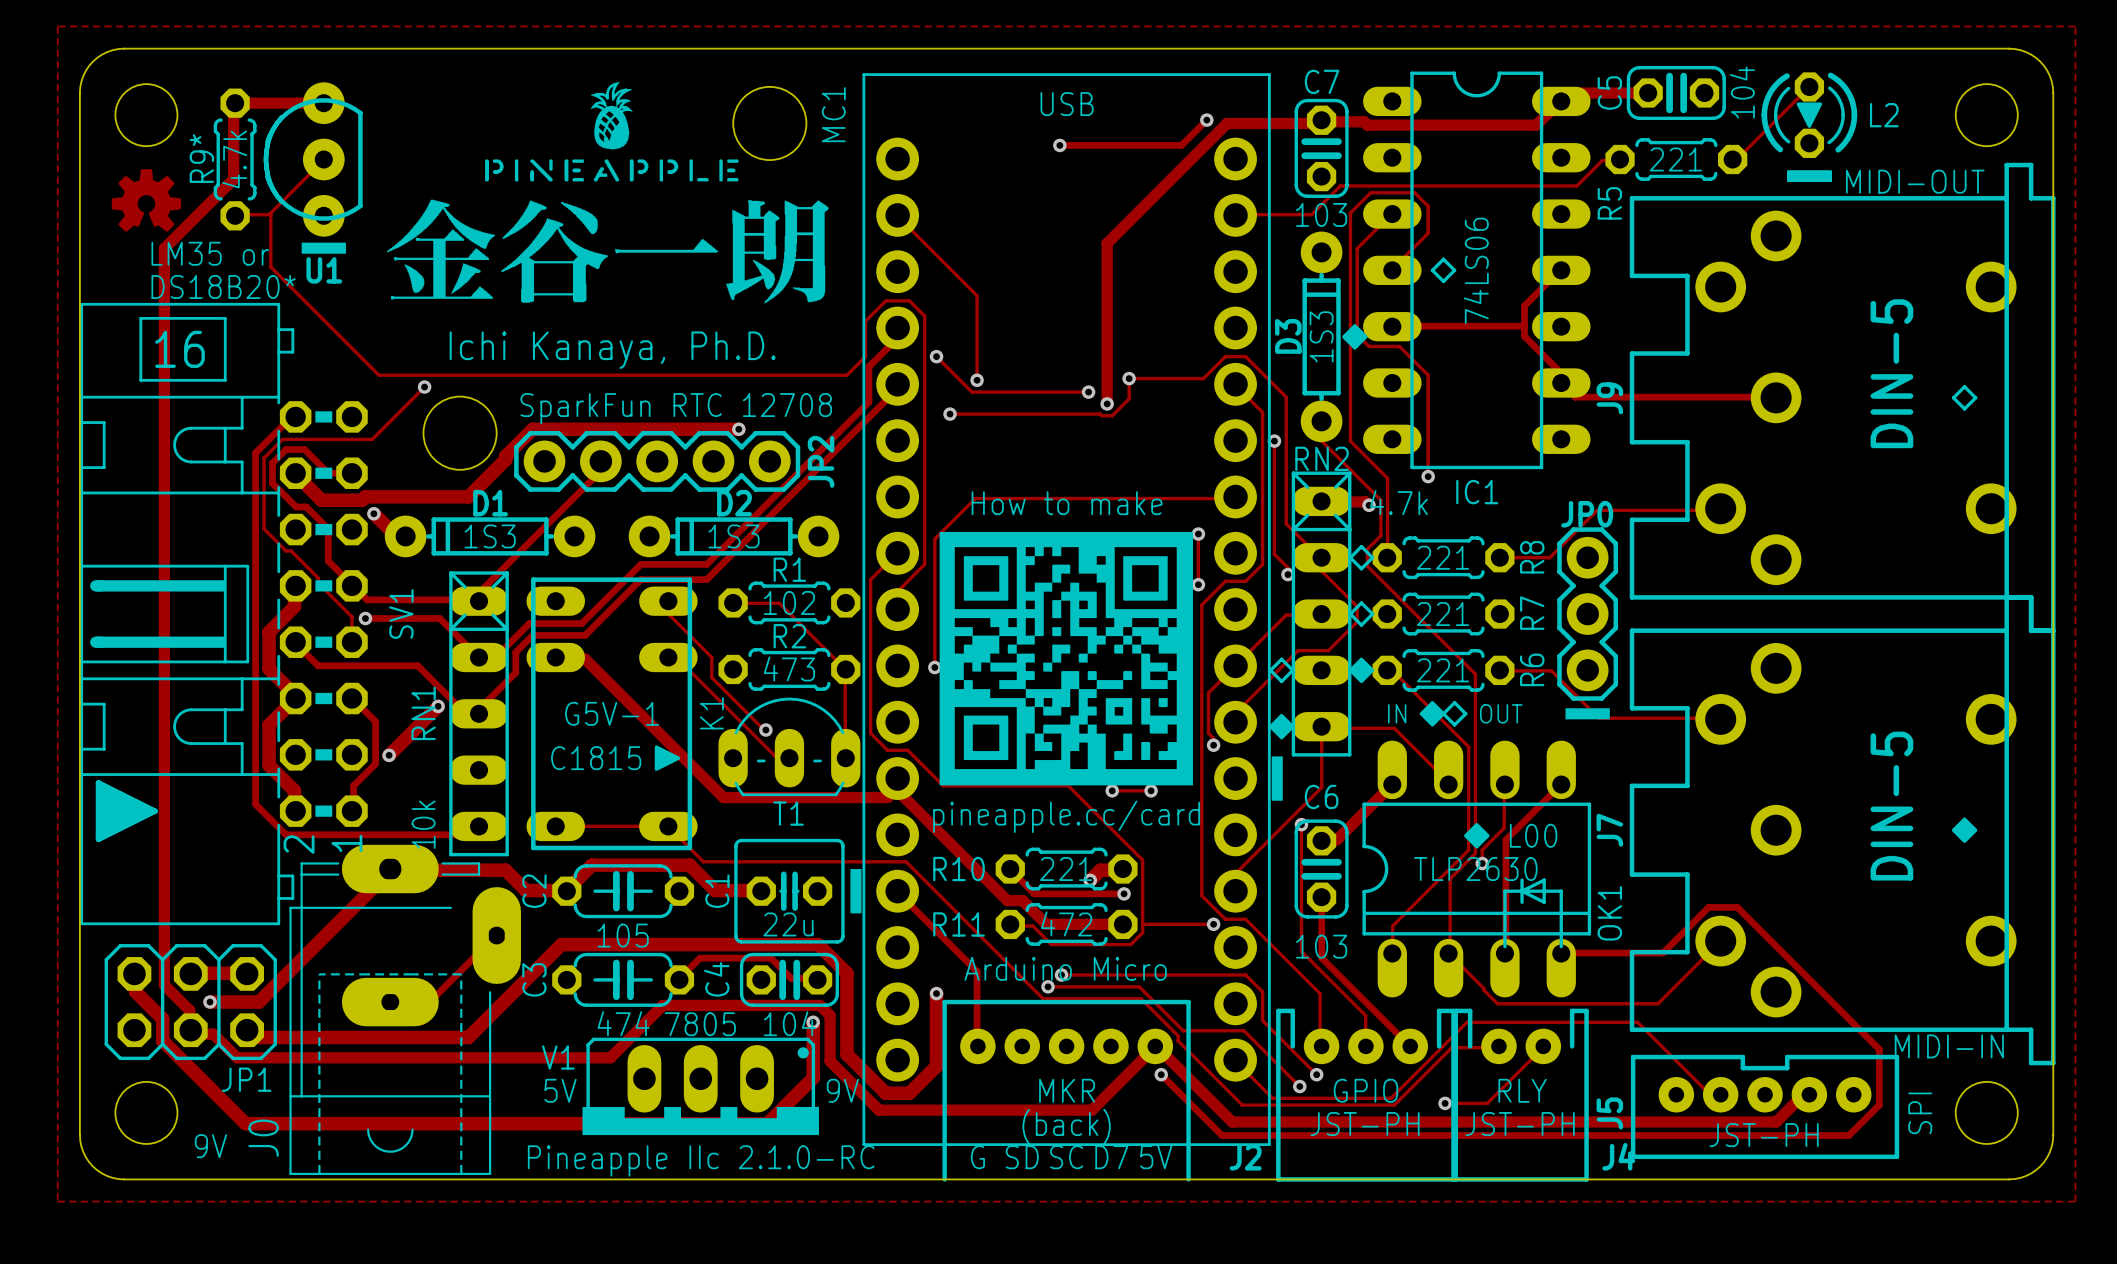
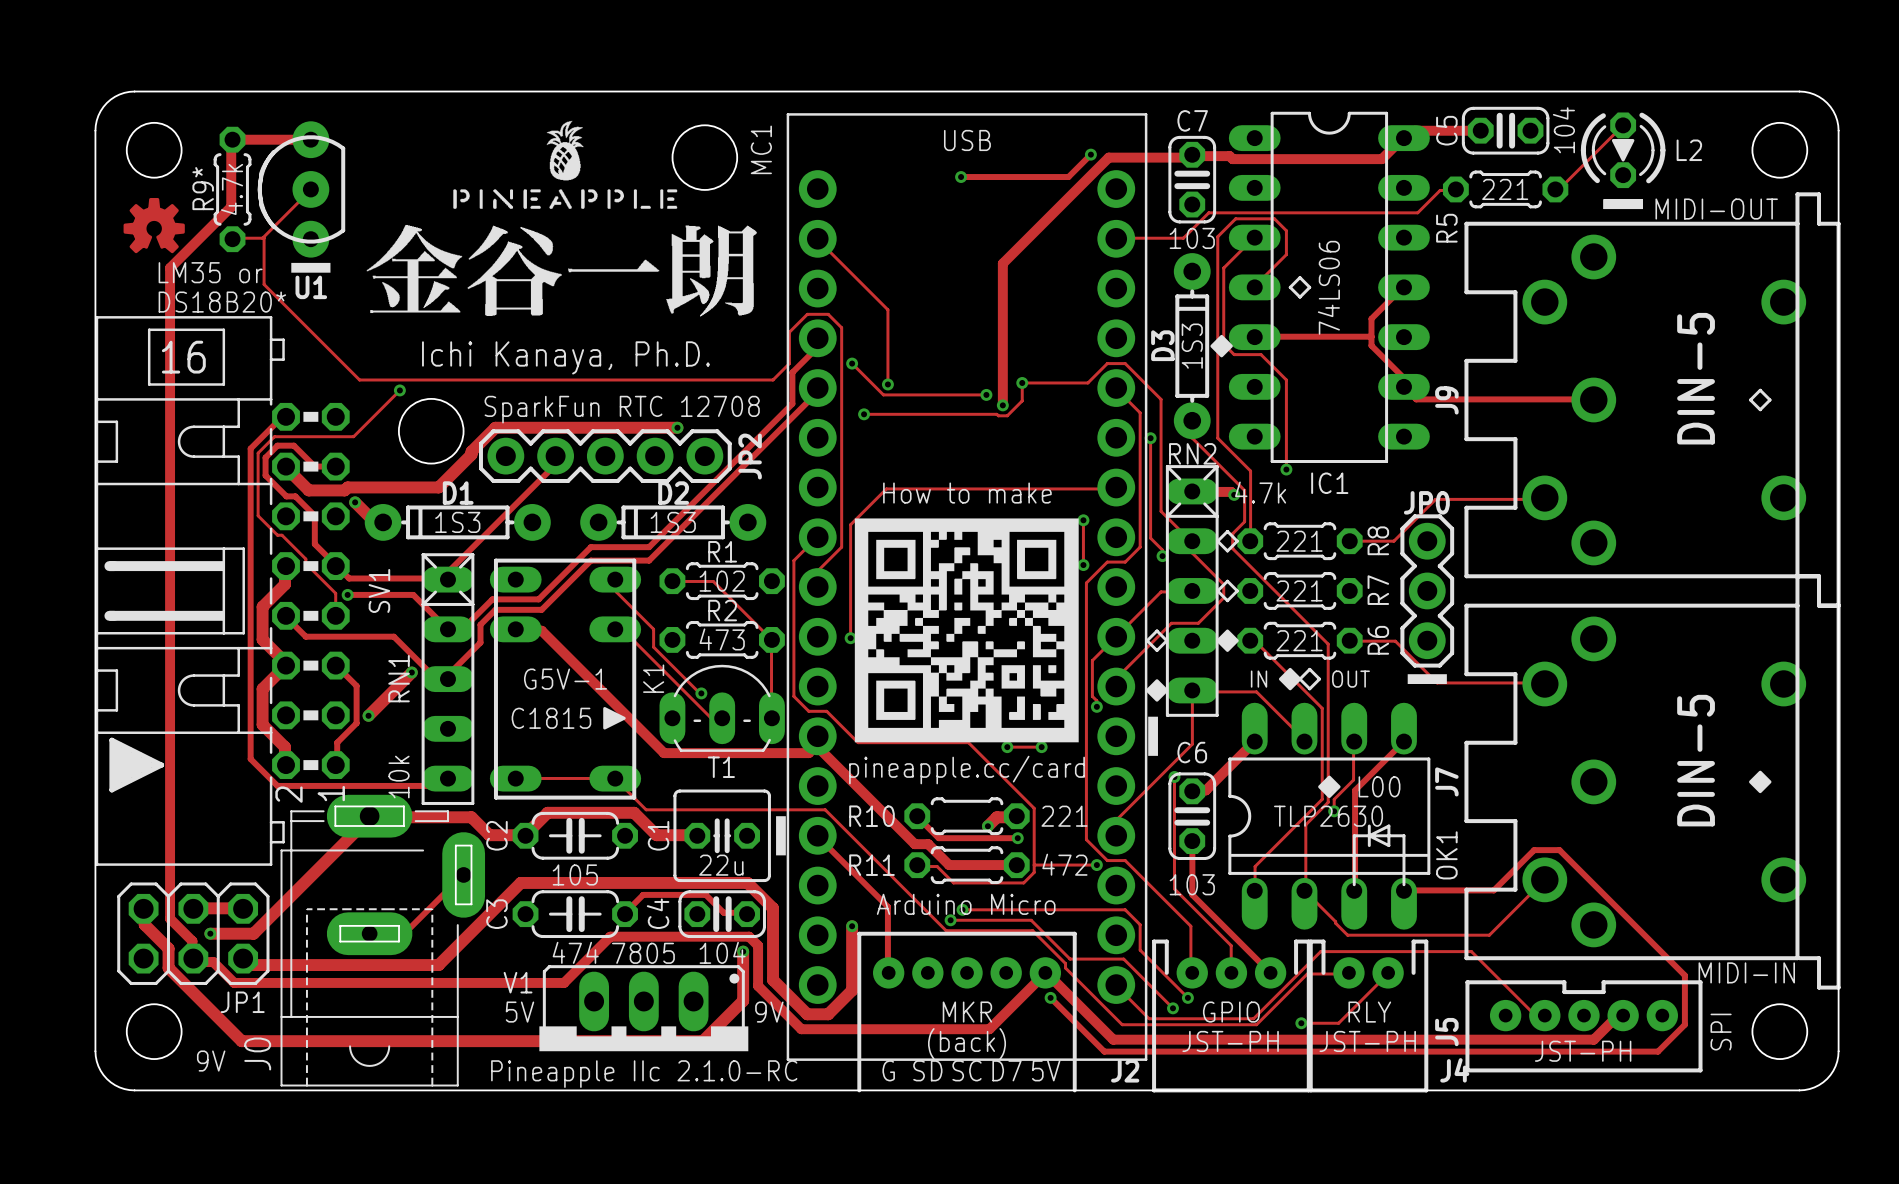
zone outline: (57, 26) (2075, 26) (2075, 1201) (57, 1201) (57, 26) -> none
text position: 221 (1066, 869) -> 221 (1064, 816)
text position: 472 (1066, 923) -> 472 (1064, 864)

